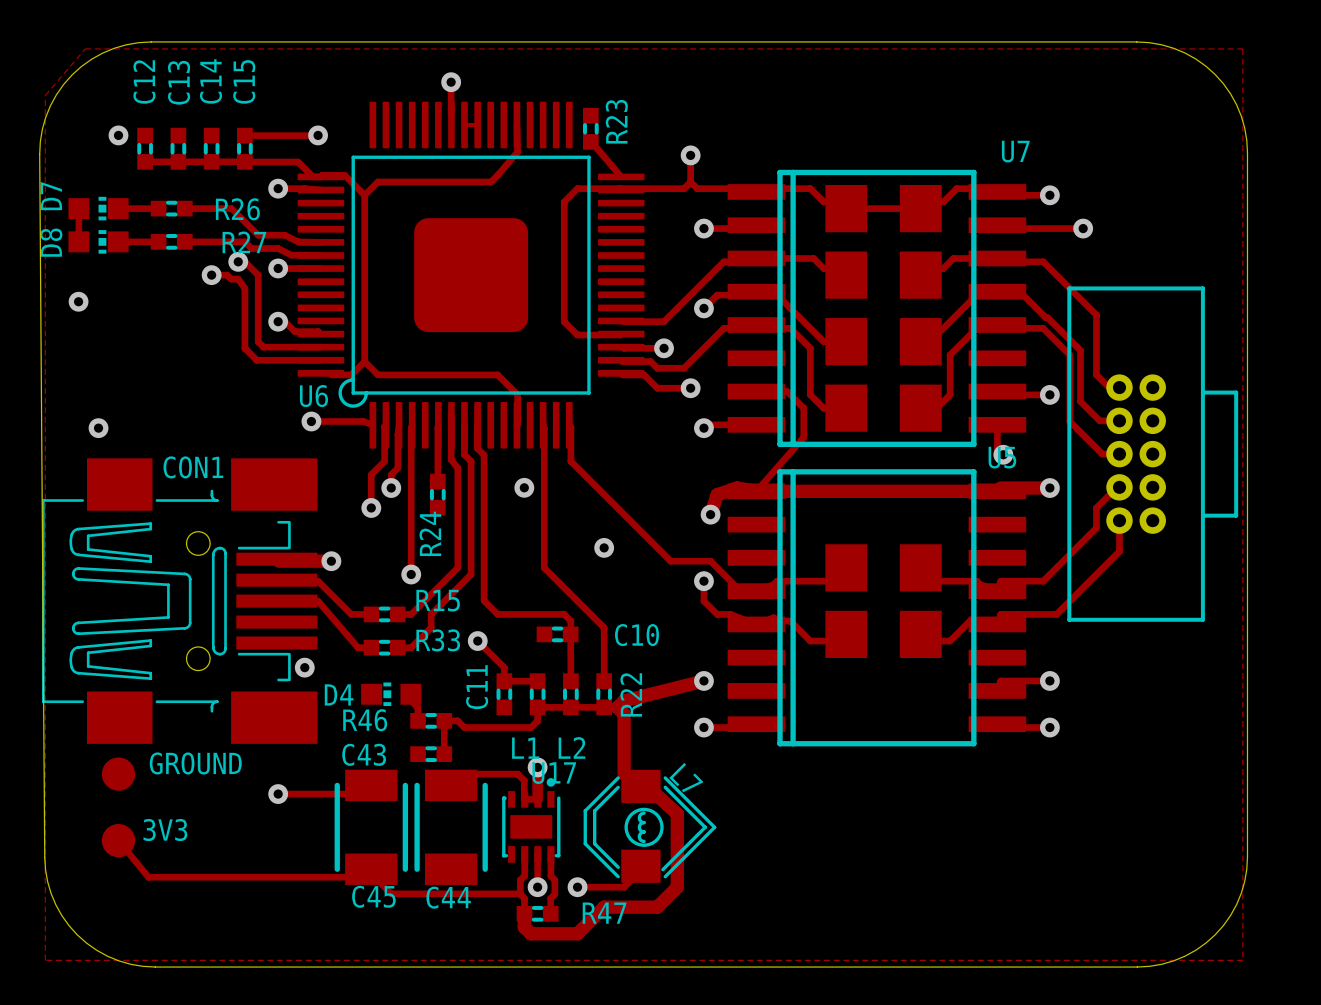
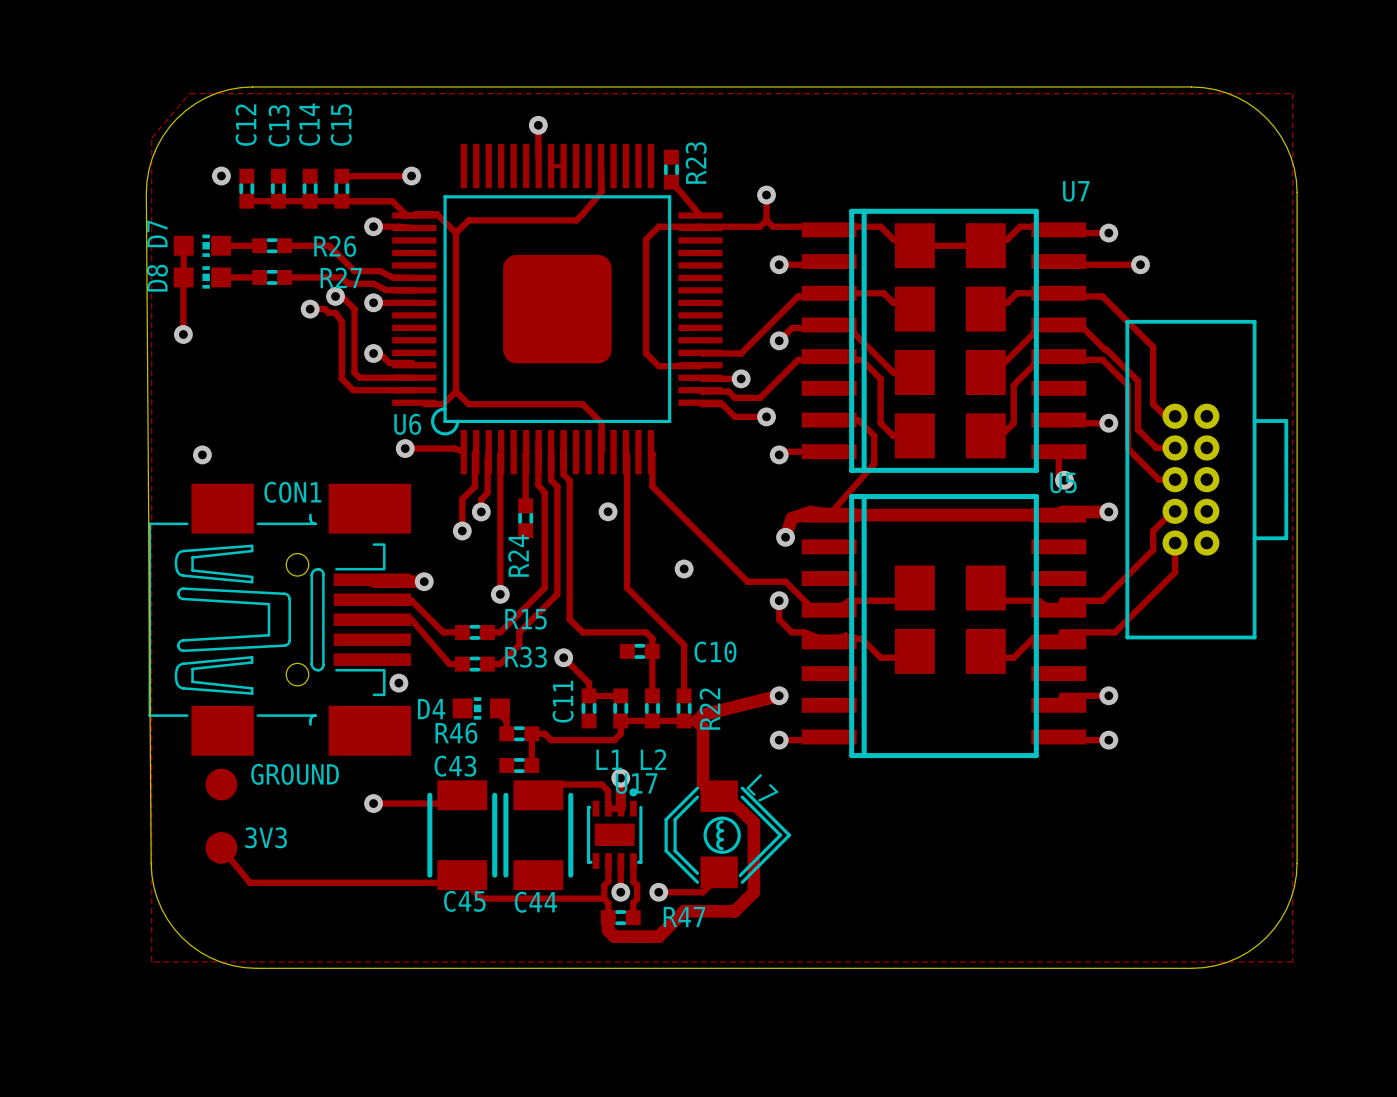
track: none -> (183, 277) (183, 334)

